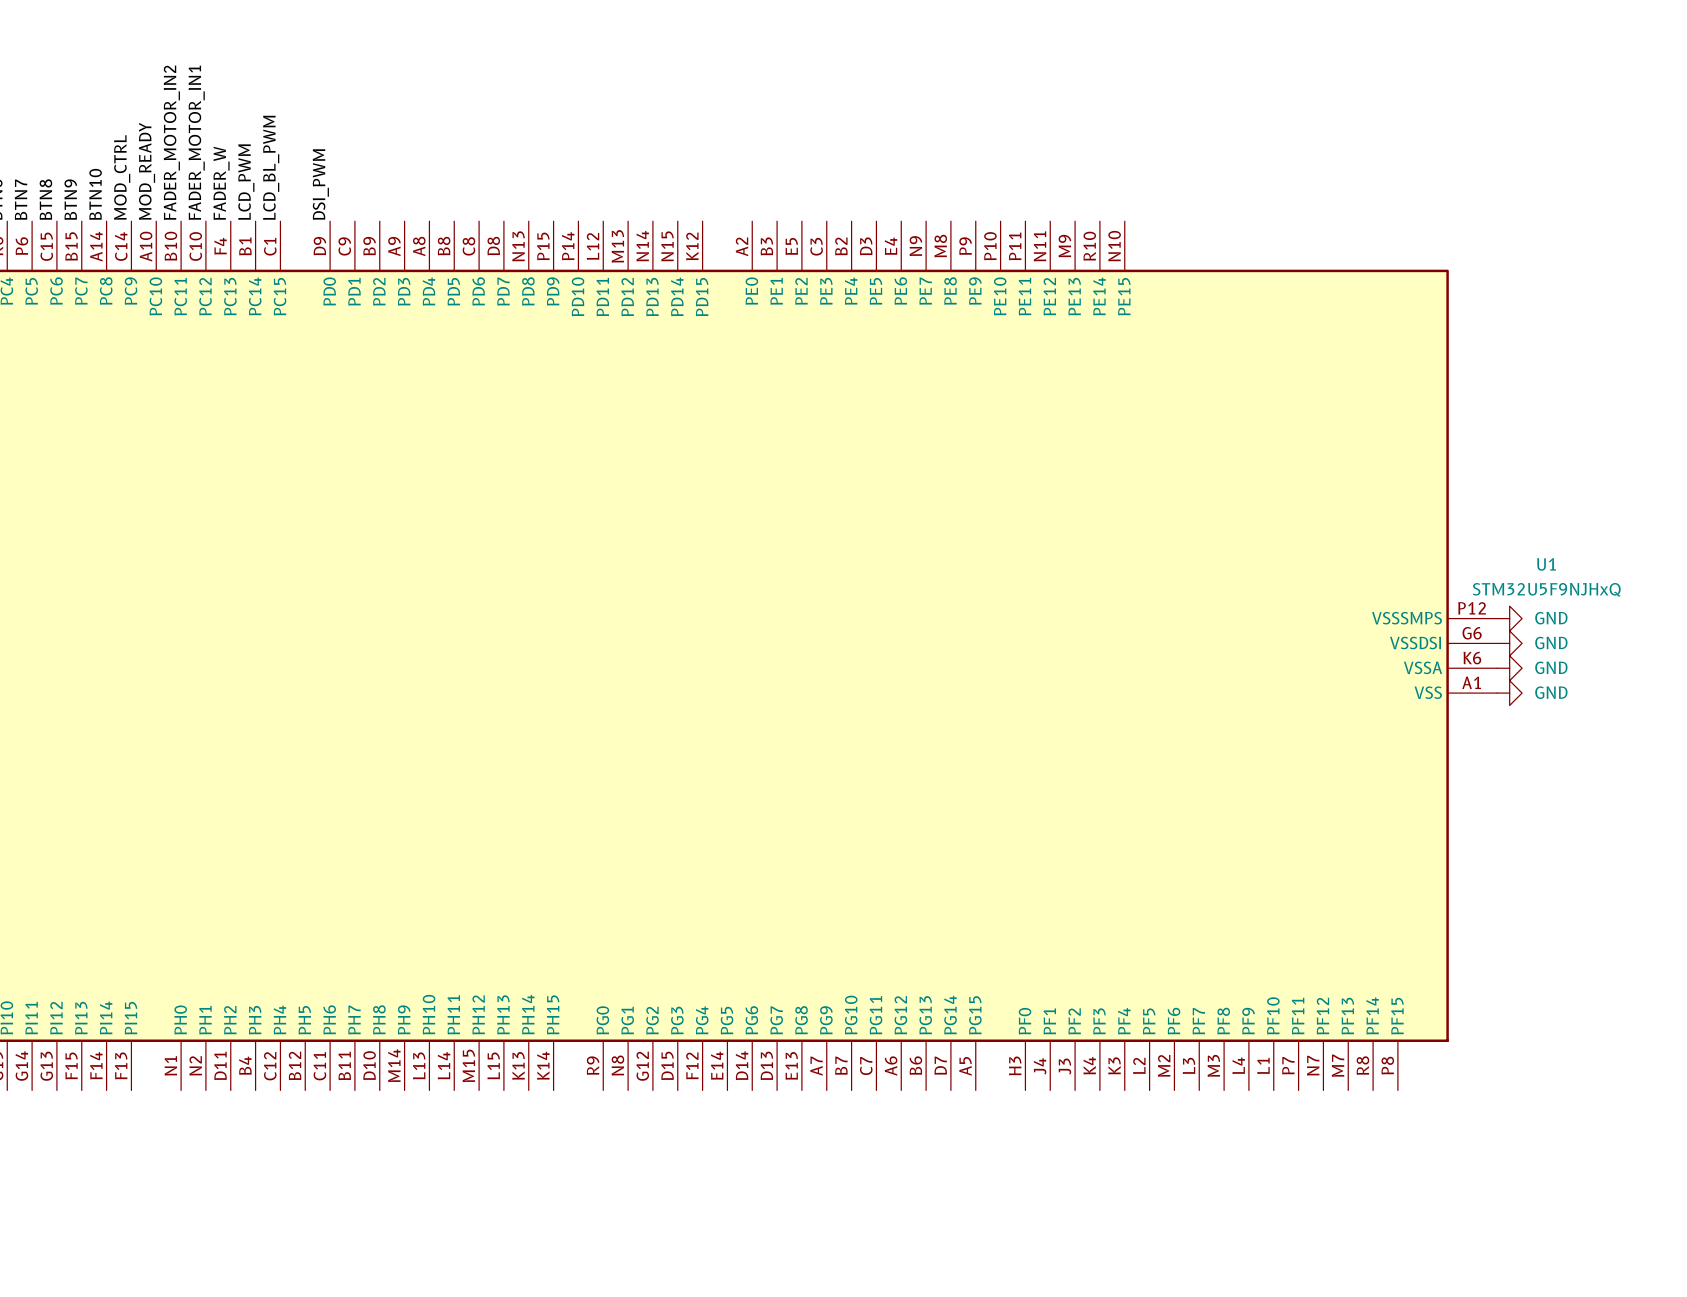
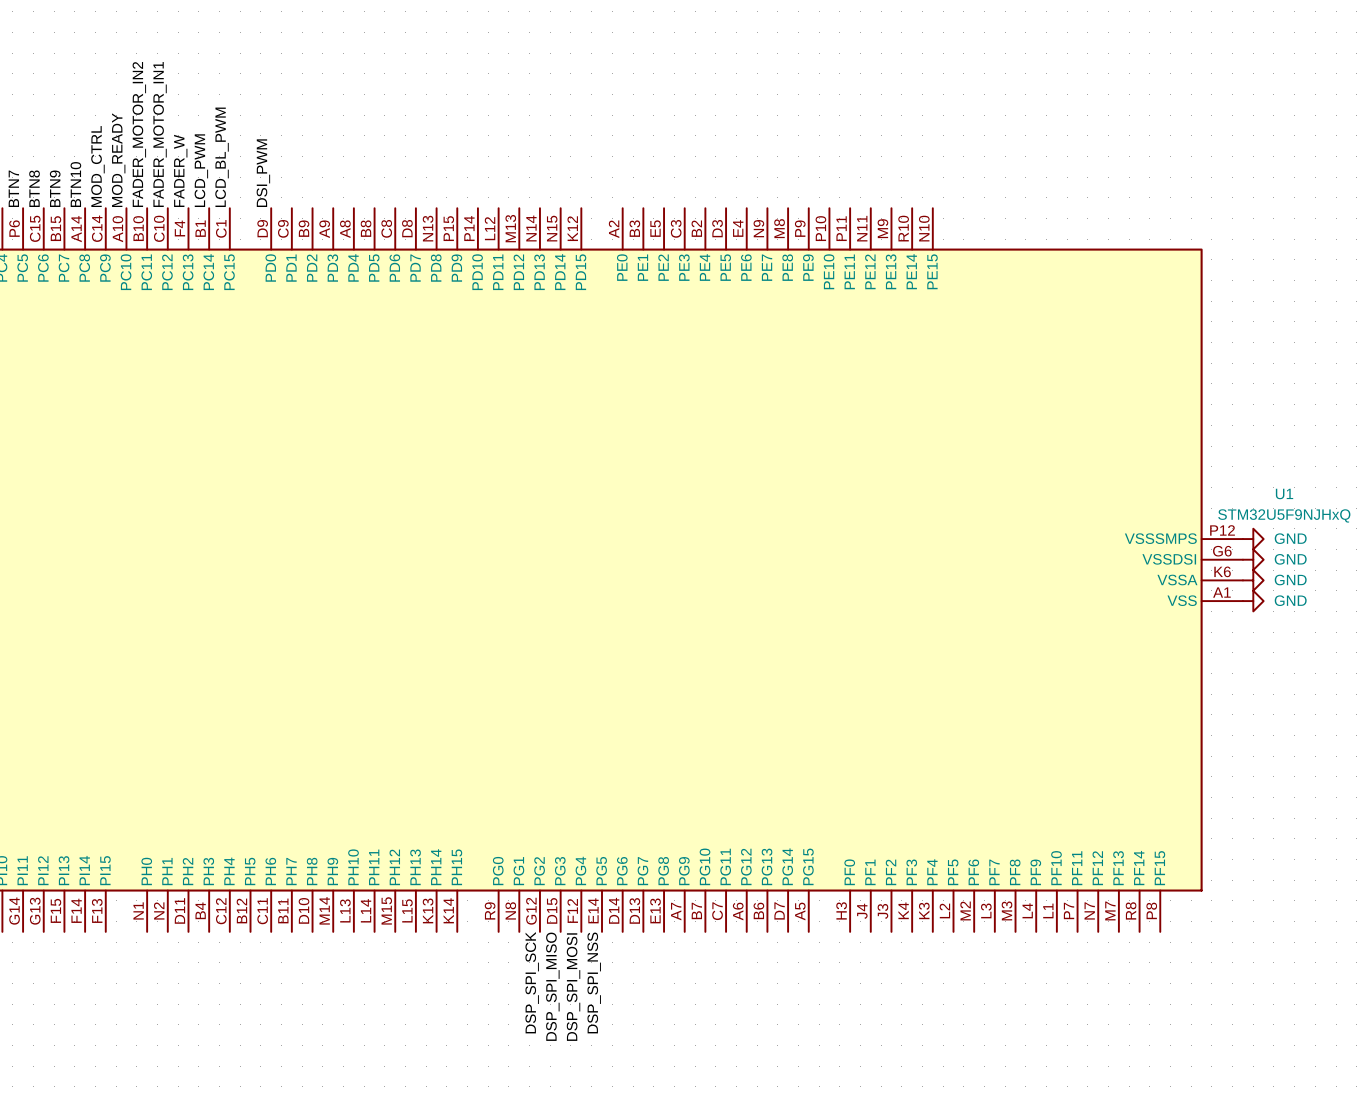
label: none -> DSP_SPI_SCK (532, 982)
label: none -> DSP_SPI_NSS (594, 982)
label: none -> DSP_SPI_MISO (552, 986)
label: none -> DSP_SPI_MOSI (573, 987)

